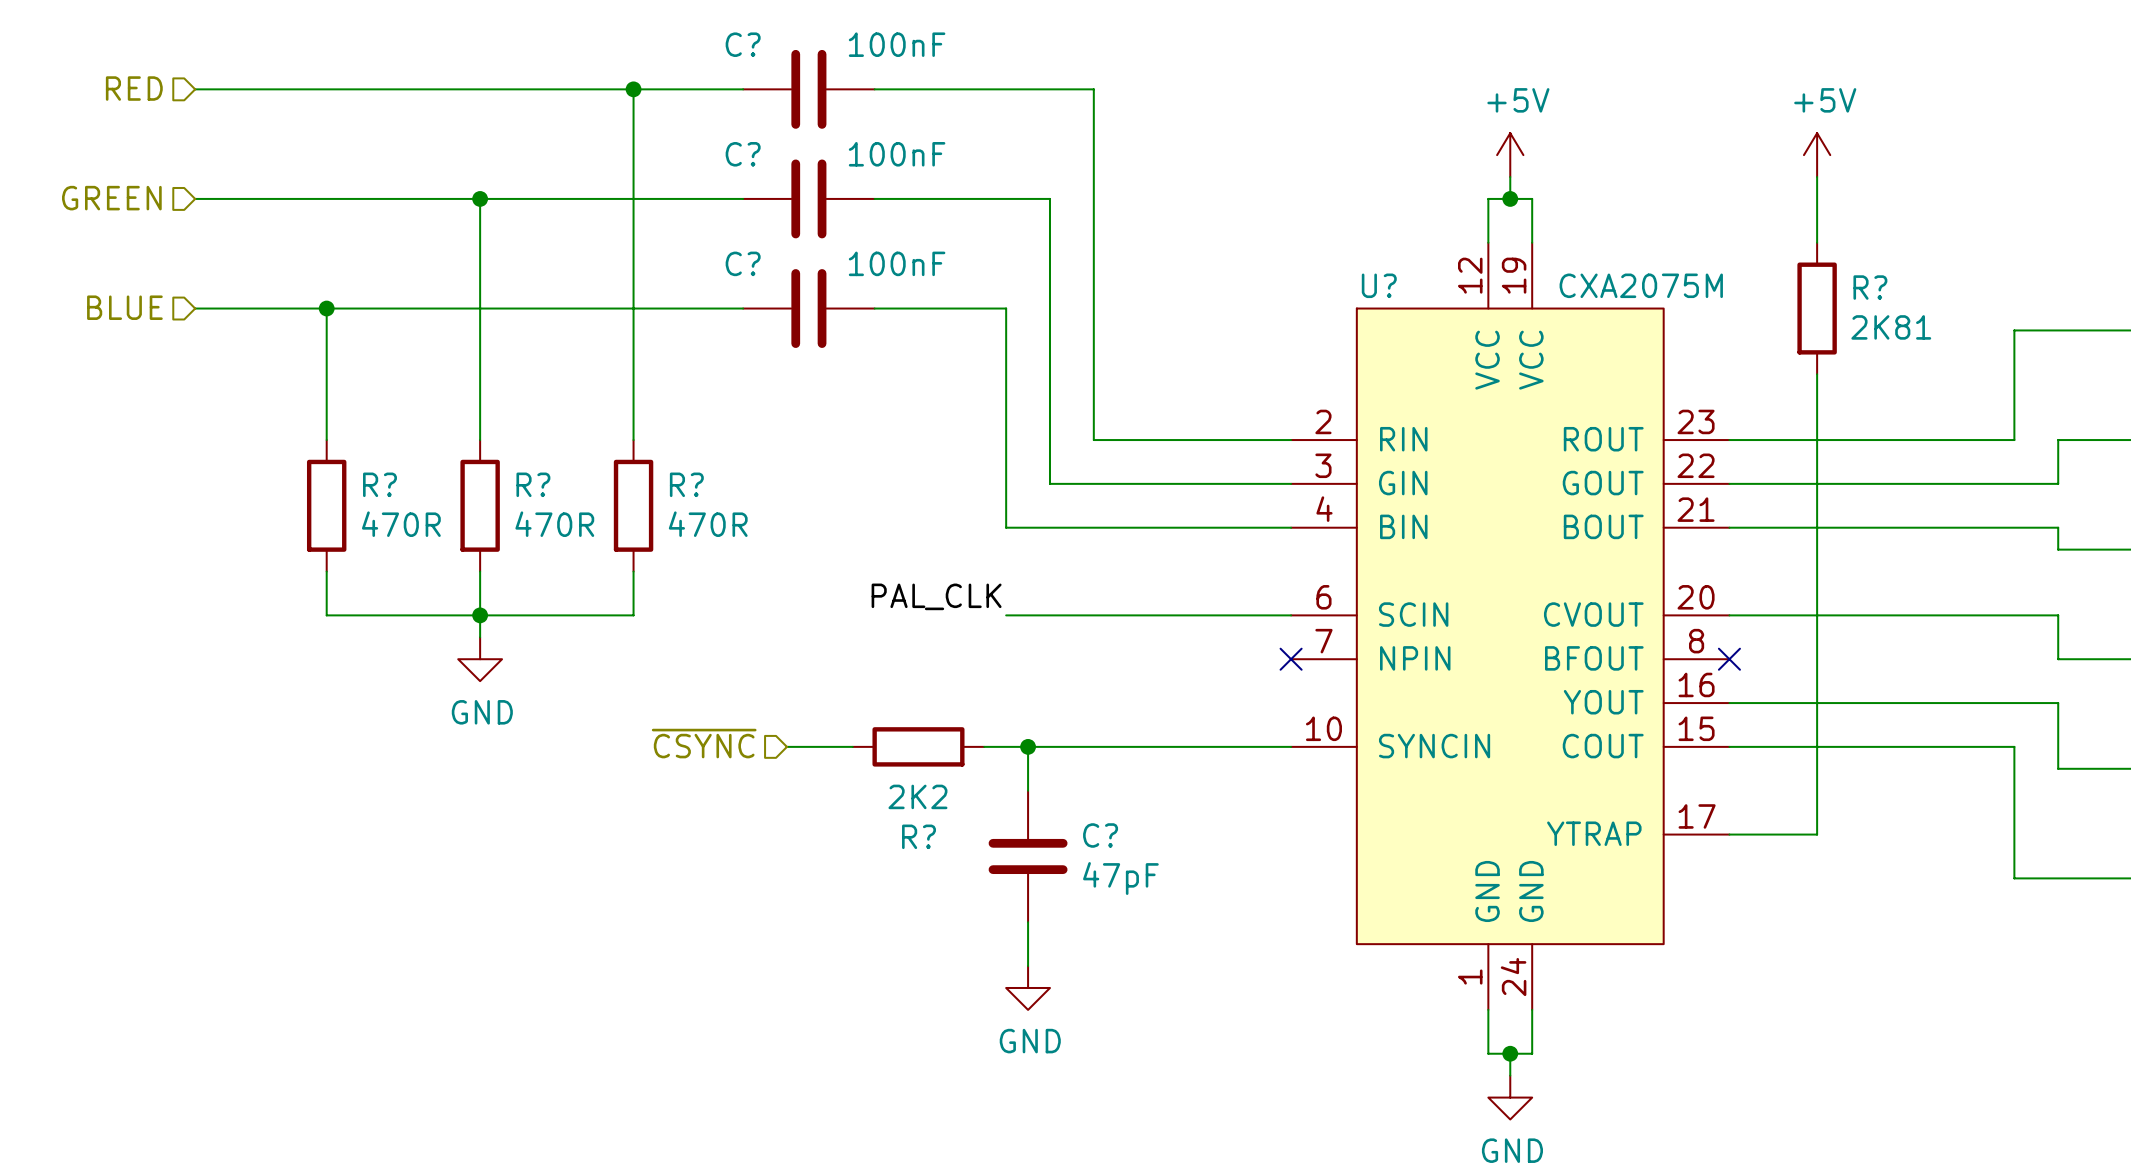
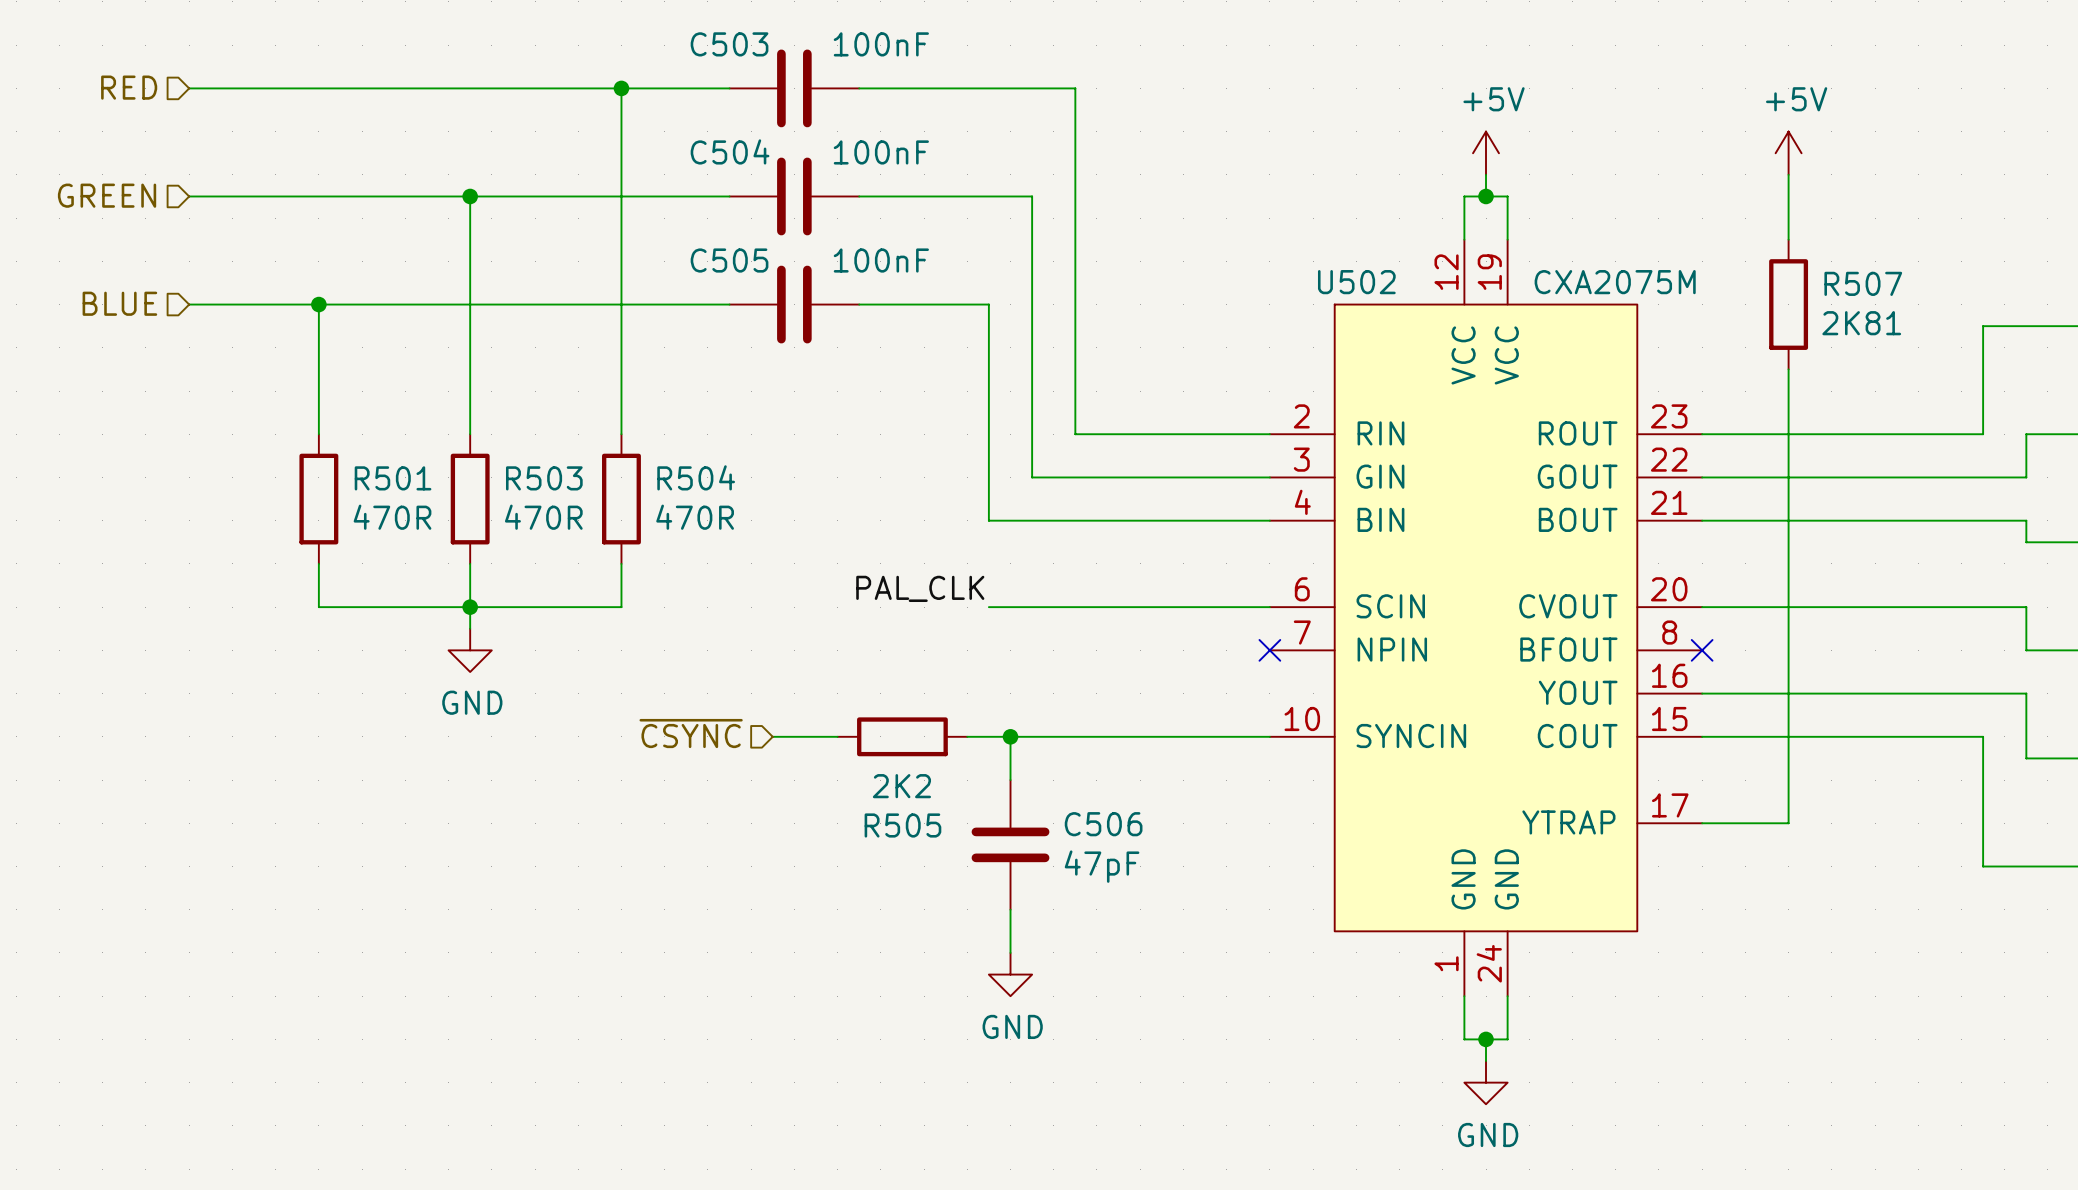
C? name: C? (743, 44) -> C503 (729, 44)
C? name: C? (743, 154) -> C504 (730, 151)
C? name: C? (743, 263) -> C505 (729, 260)
U? name: U? (1379, 285) -> U502 (1356, 282)
R? name: R? (1870, 287) -> R507 (1863, 283)
R? name: R? (379, 484) -> R501 (393, 478)
R? name: R? (533, 484) -> R503 (544, 478)
R? name: R? (686, 484) -> R504 (696, 477)
C? name: C? (1100, 835) -> C506 (1103, 824)
R? name: R? (919, 836) -> R505 (902, 825)

